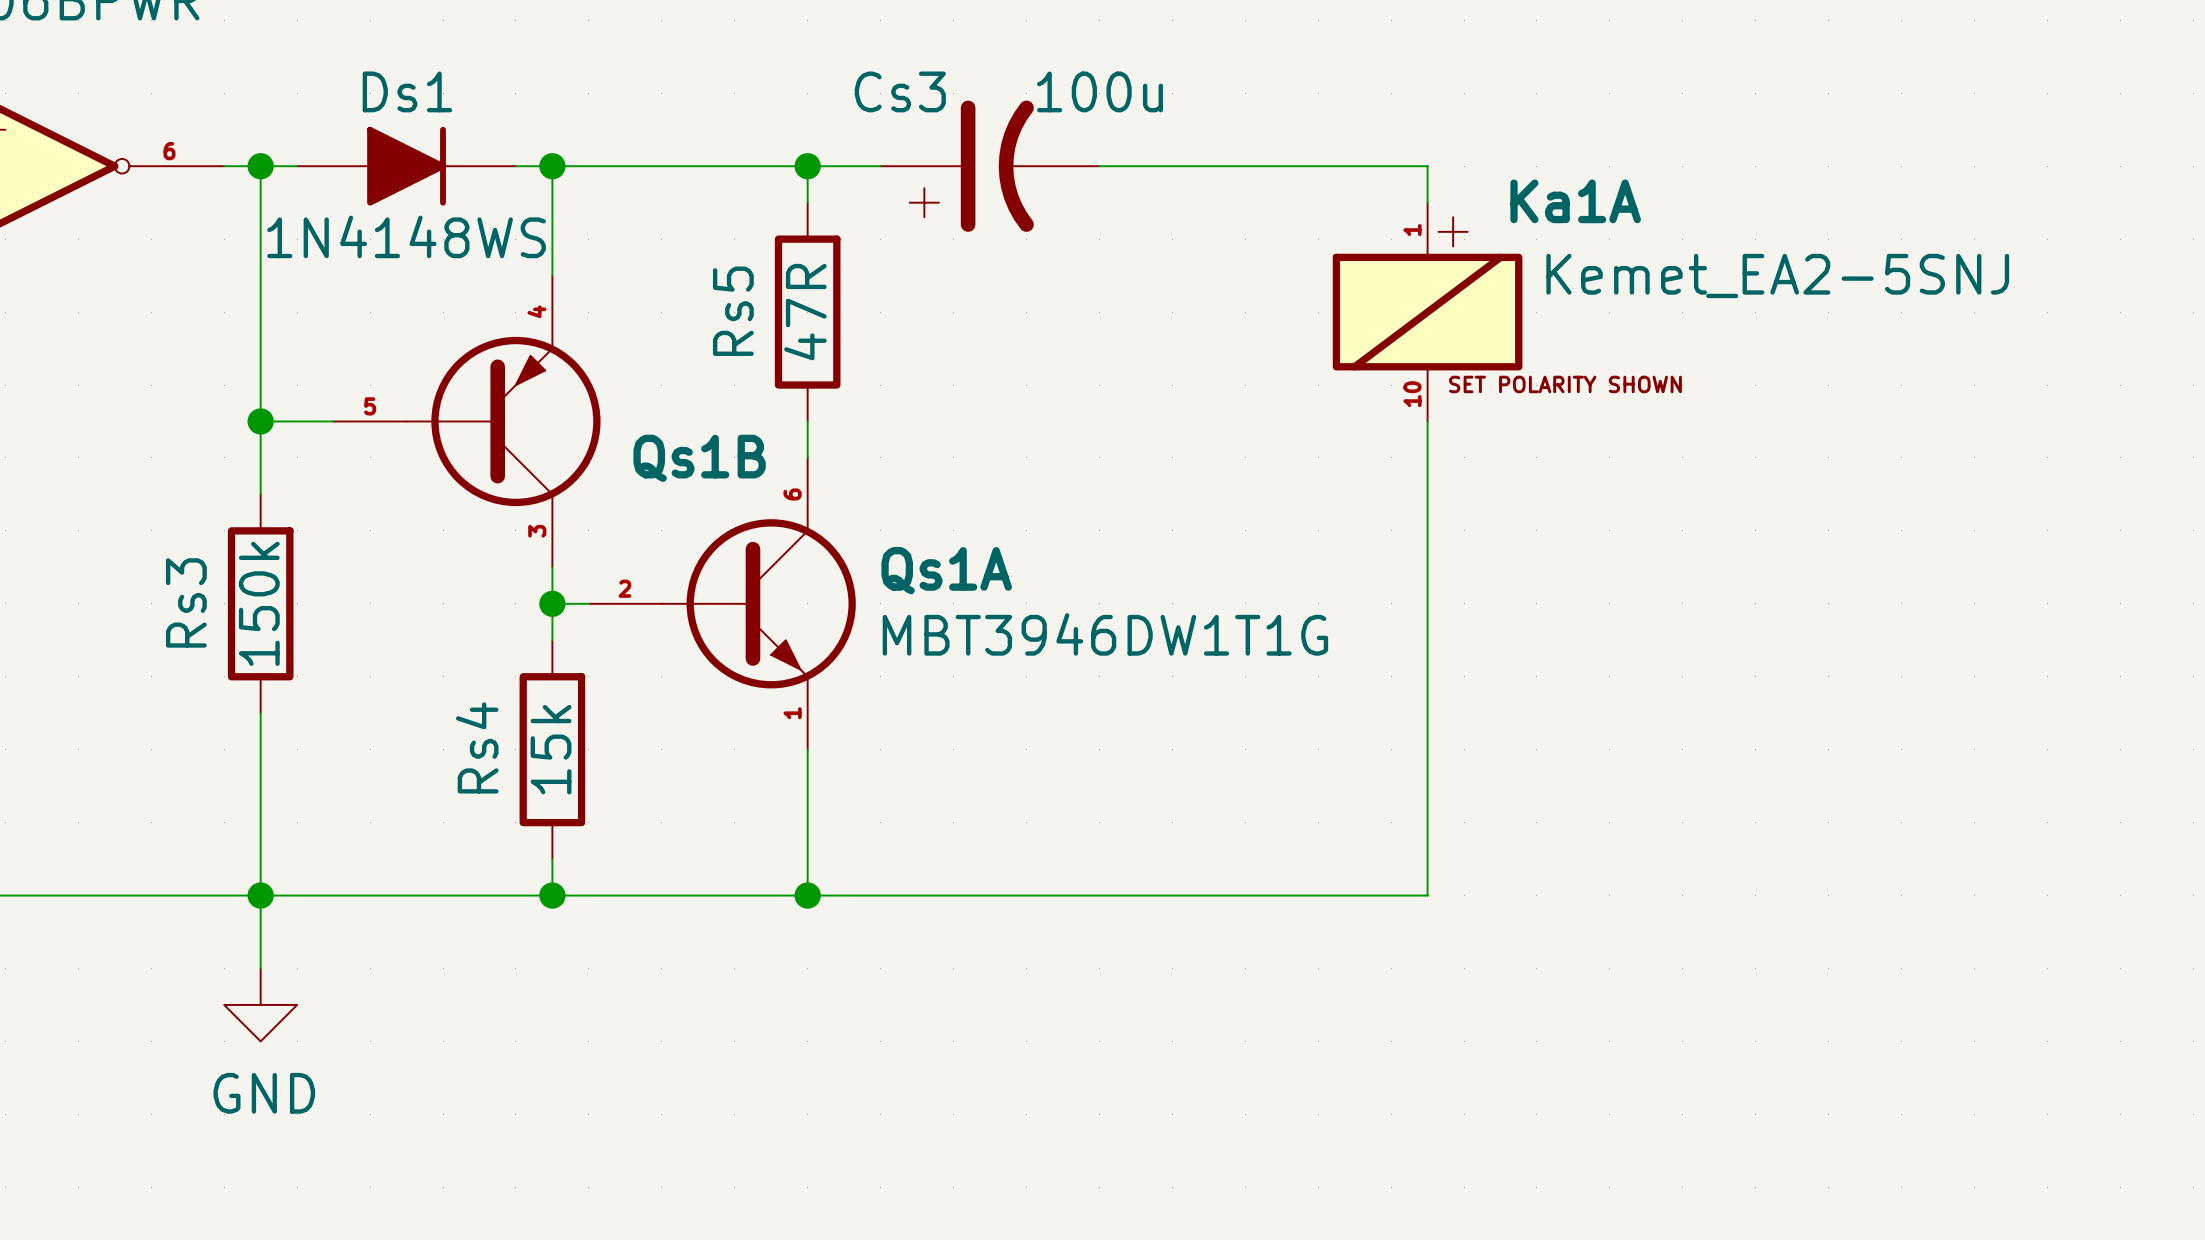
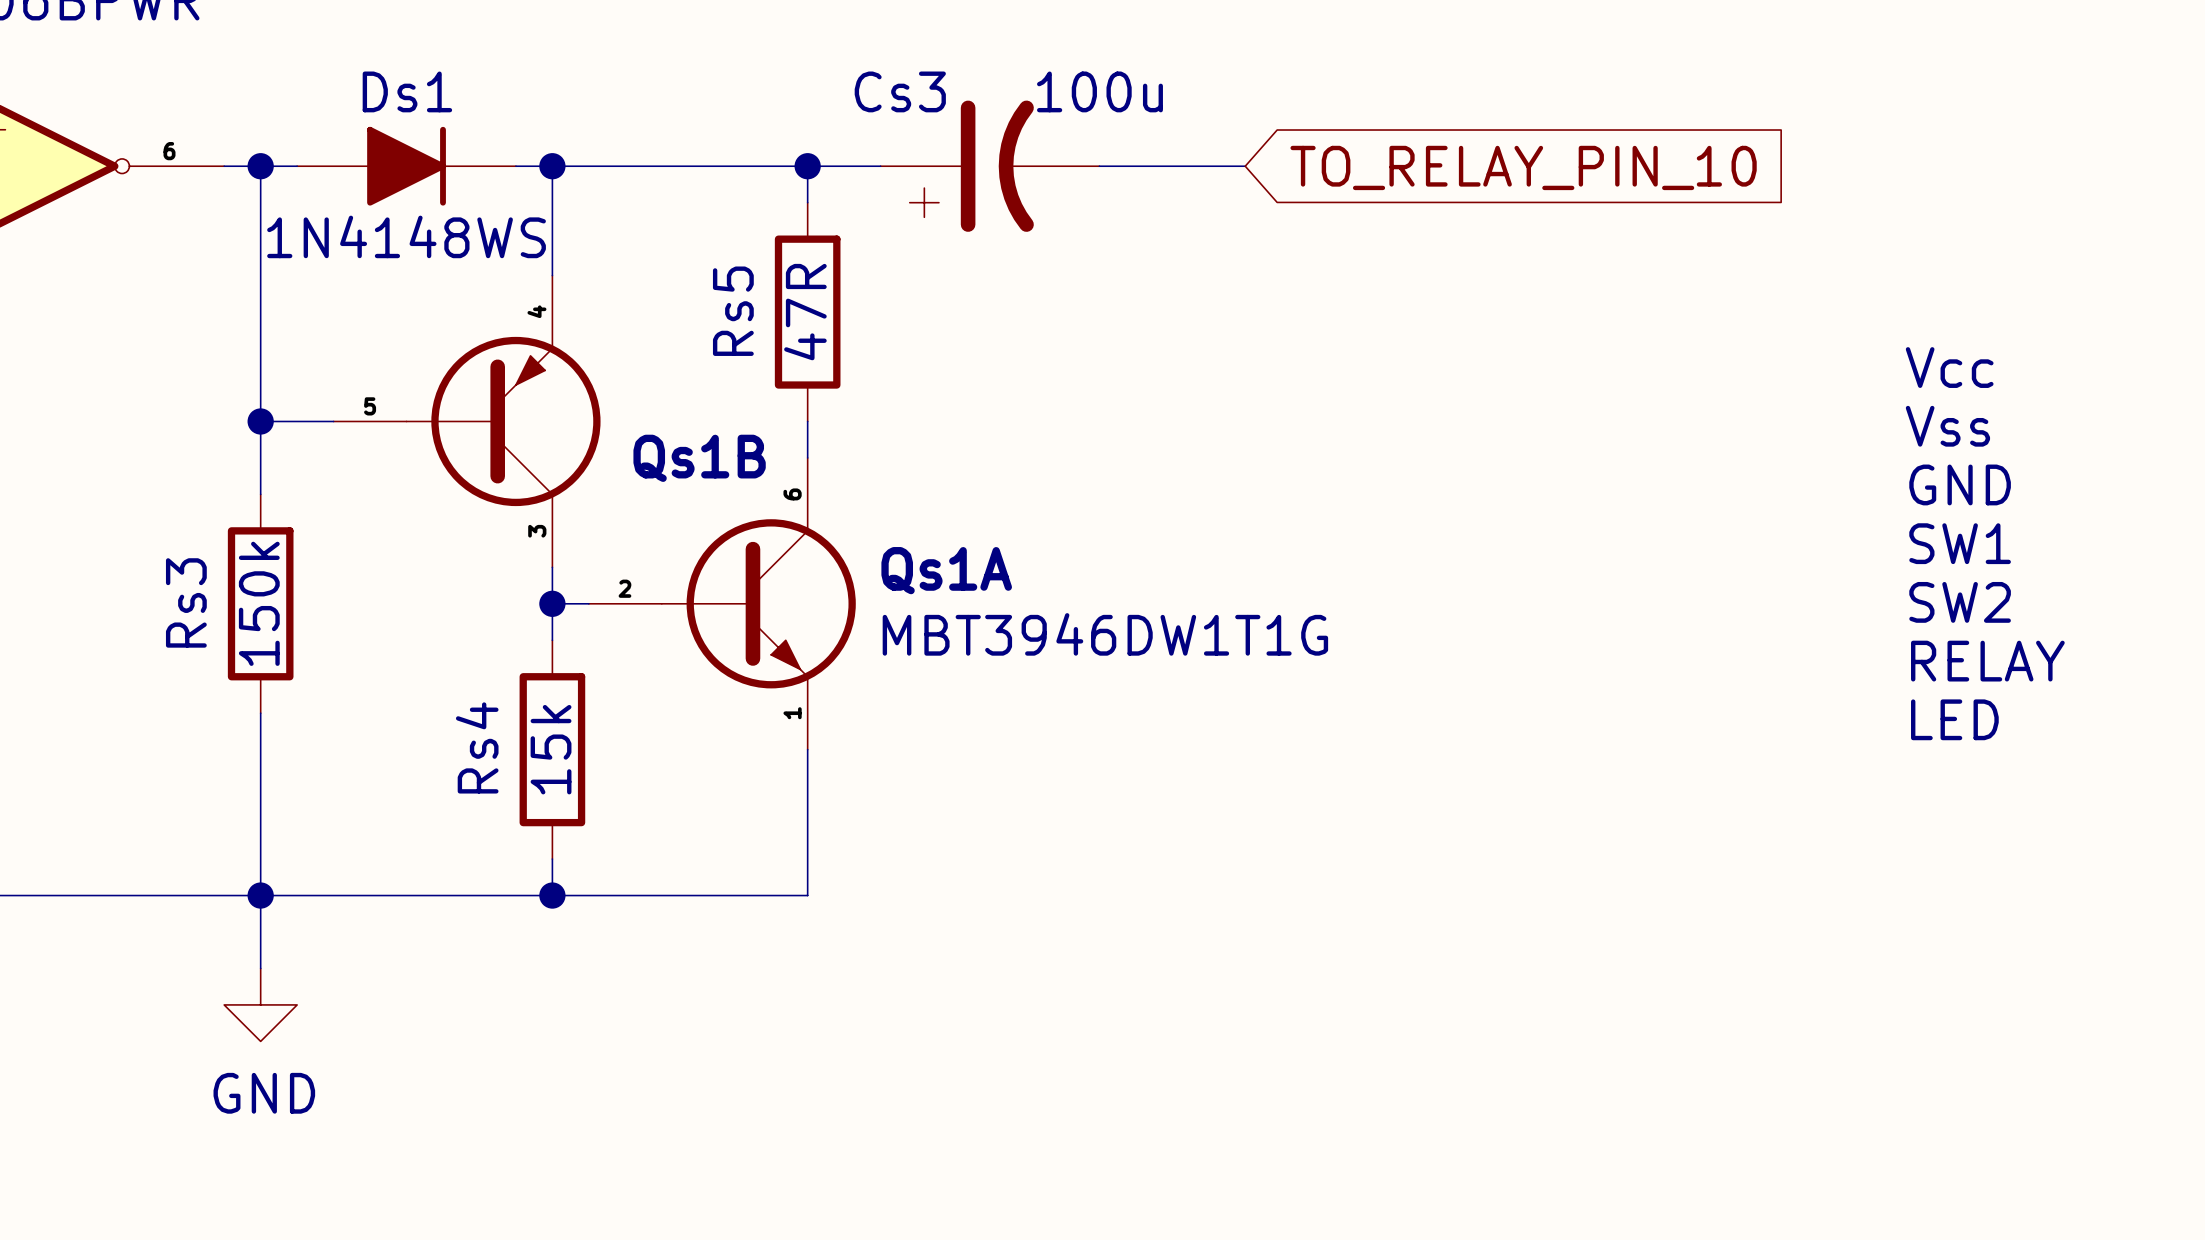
wire: (1245, 166) (1427, 166) (1427, 202) -> none
global label: none -> TO_RELAY_PIN_10 (1523, 167)
Ka1A: Kemet_EA2-5SNJ (1427, 312) -> none
text: none -> Vcc (1949, 367)
wire: (1427, 421) (1427, 895) (807, 895) -> none
text: none -> Vss (1947, 426)
text: none -> GND (1960, 484)
text: none -> SW1 (1960, 543)
text: none -> SW2 (1960, 602)
text: none -> RELAY (1987, 661)
text: none -> LED (1954, 719)
junction: (807, 895) -> none

